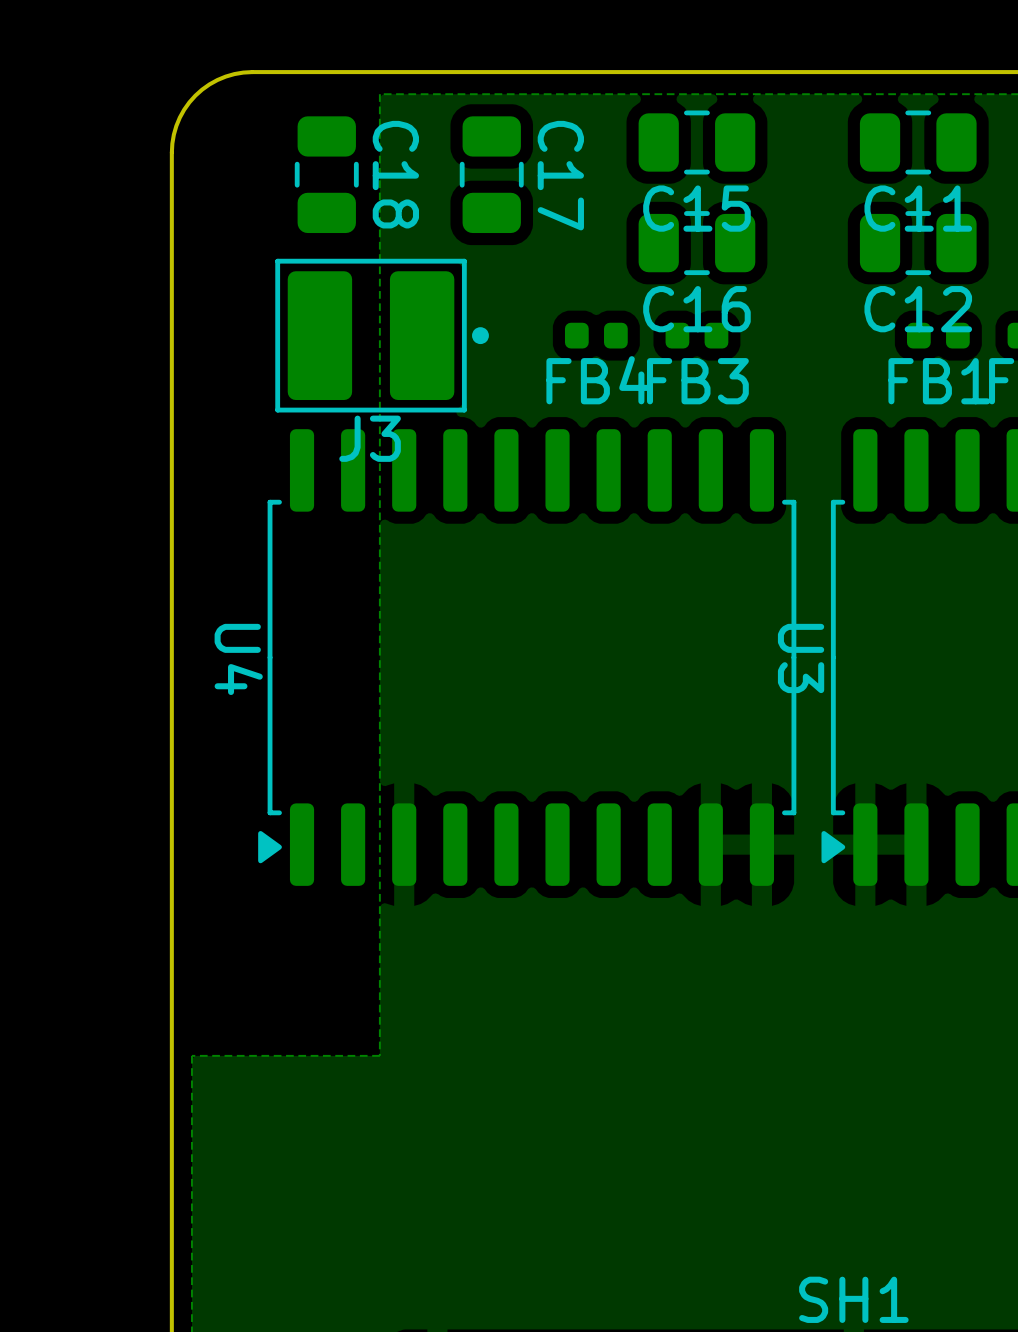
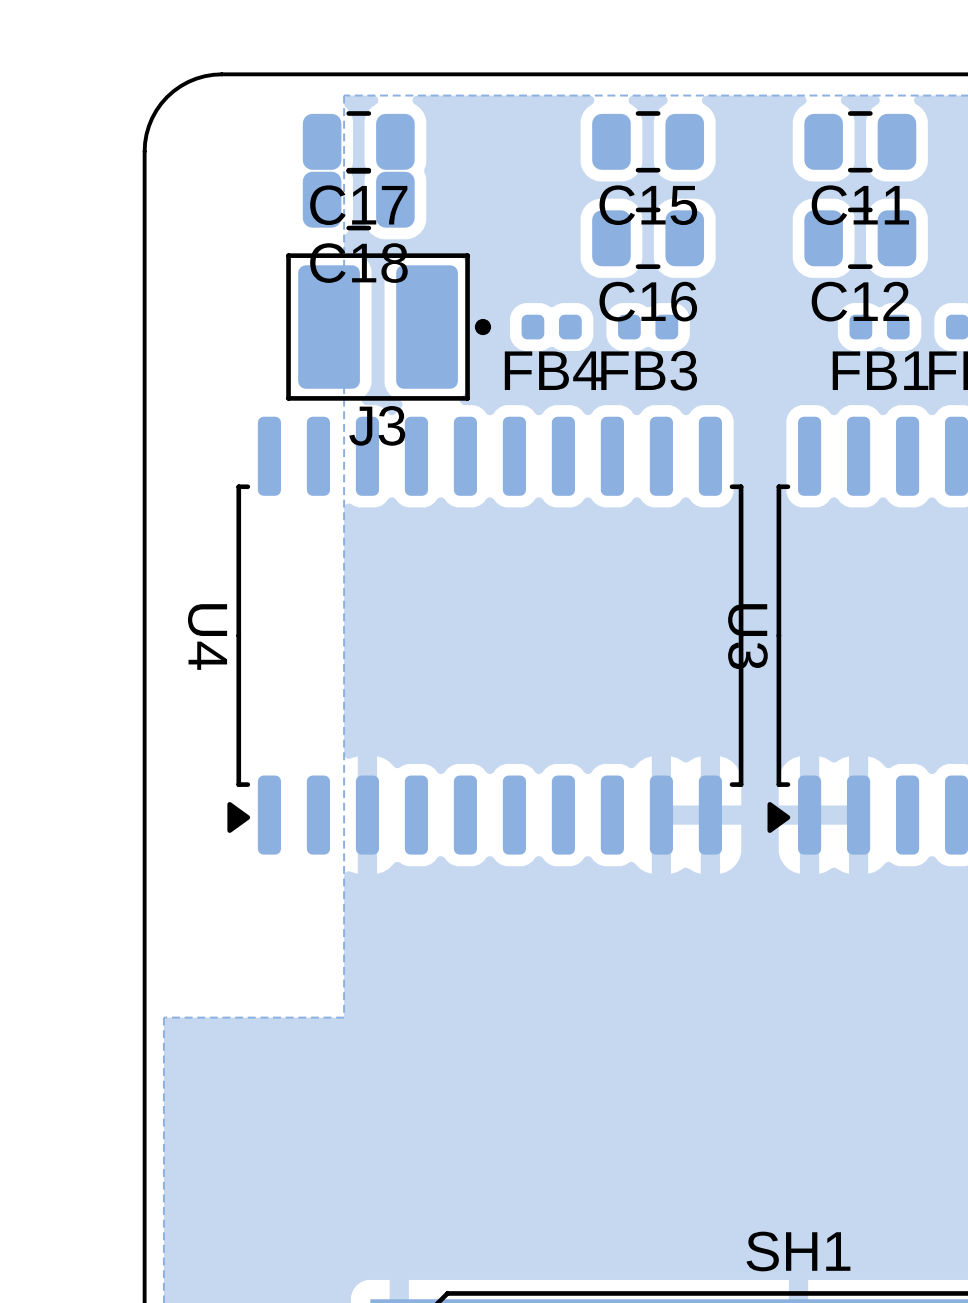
C18 rotation: 0° (326, 174) -> 90° clockwise (358, 199)
C18 position: (326, 174) -> (358, 199)
C17 rotation: 0° (491, 174) -> 90° clockwise (358, 141)
C17 position: (491, 174) -> (358, 141)
J3 position: (382, 335) -> (388, 327)

